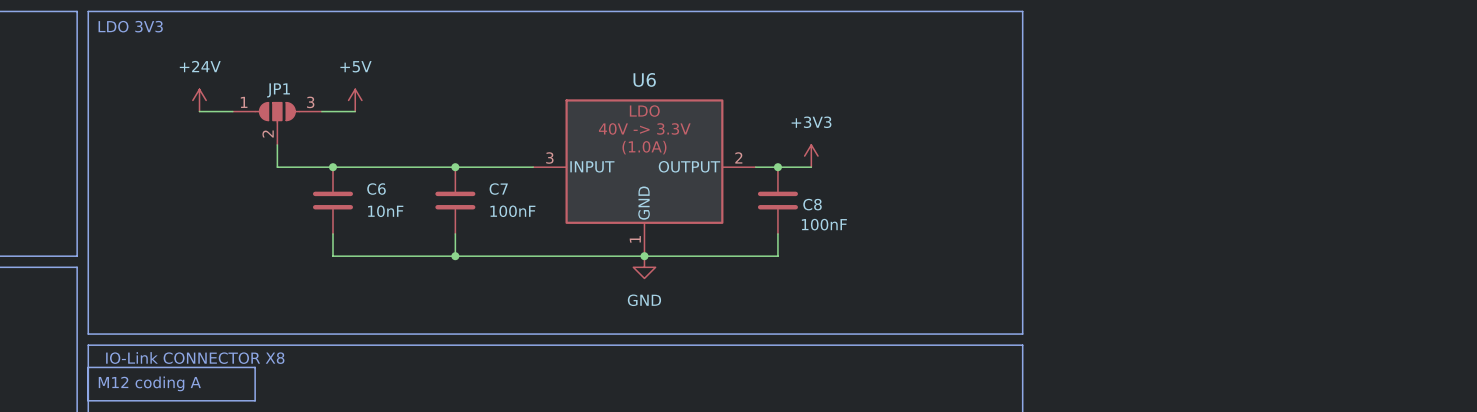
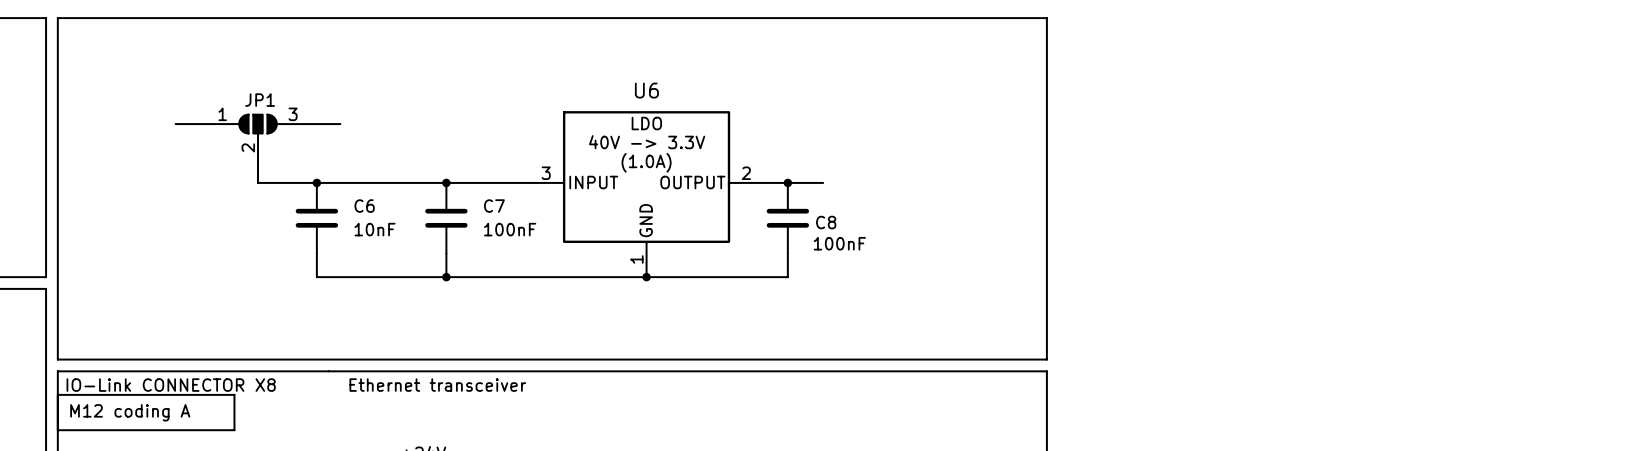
text: LDO 3V3 (130, 26) -> none
power symbol: +24V (199, 100) -> none
power symbol: +5V (355, 100) -> none
power symbol: +3V3 (811, 156) -> none
power symbol: GND (644, 267) -> none
text: none -> Ethernet transceiver (437, 385)

